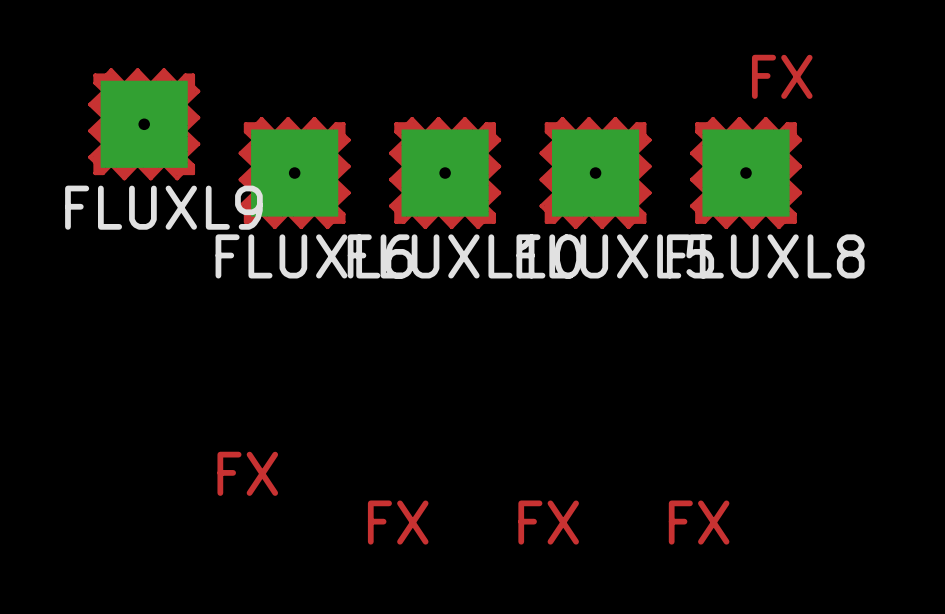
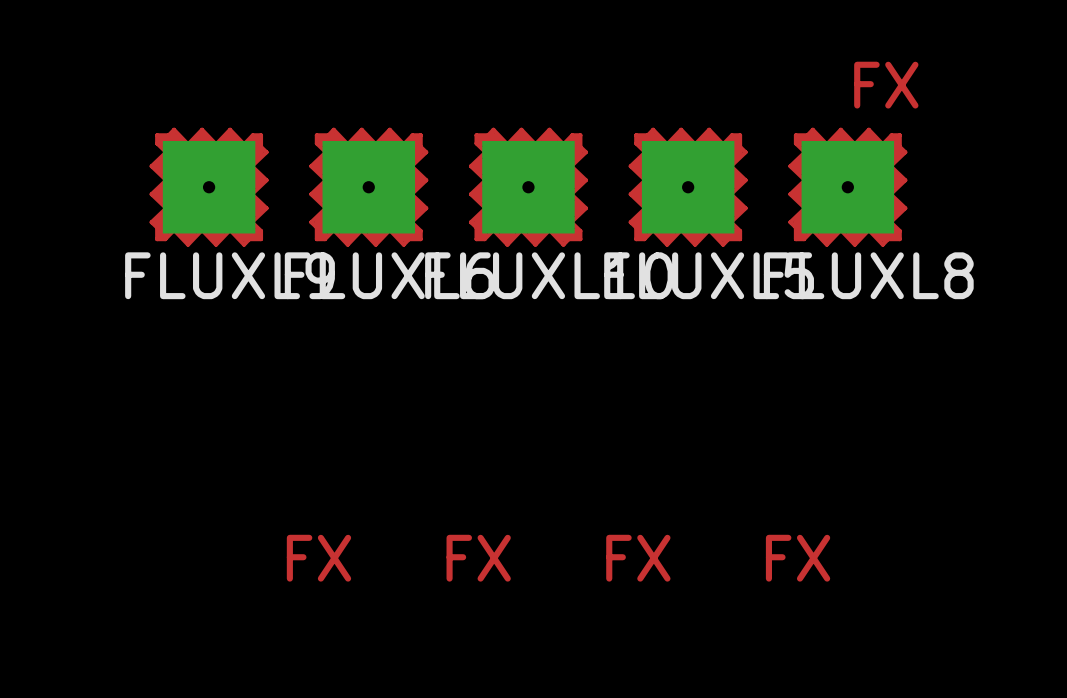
FLUXL9 position: (144, 124) -> (209, 187)

